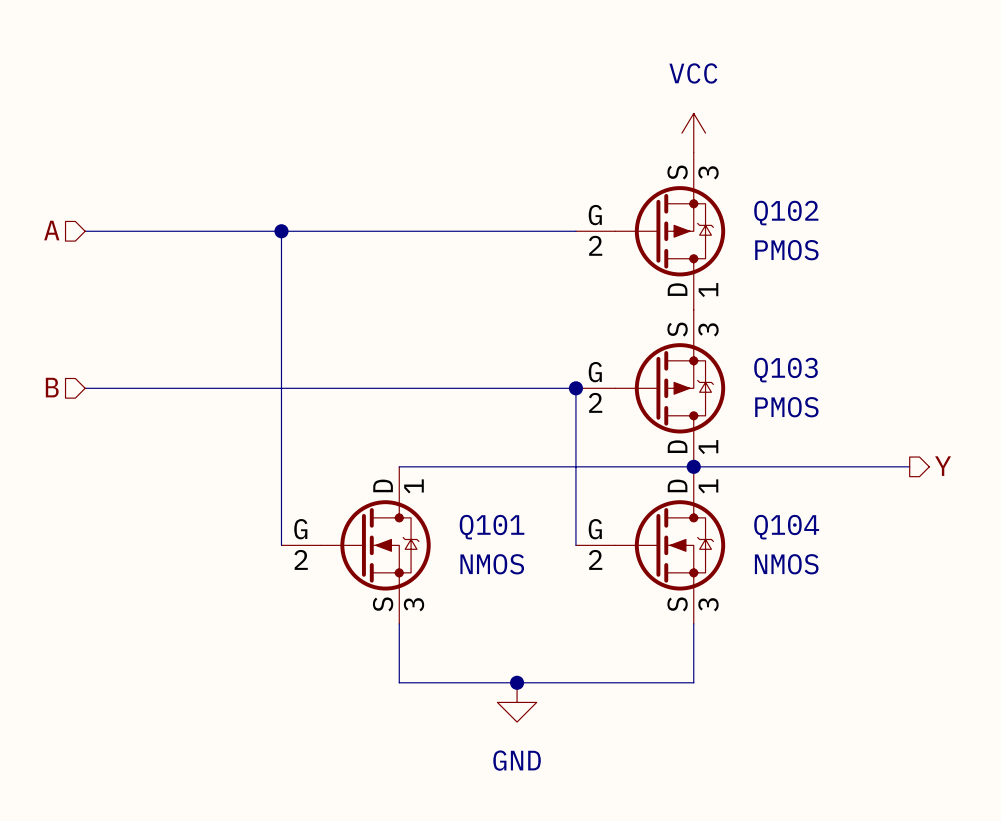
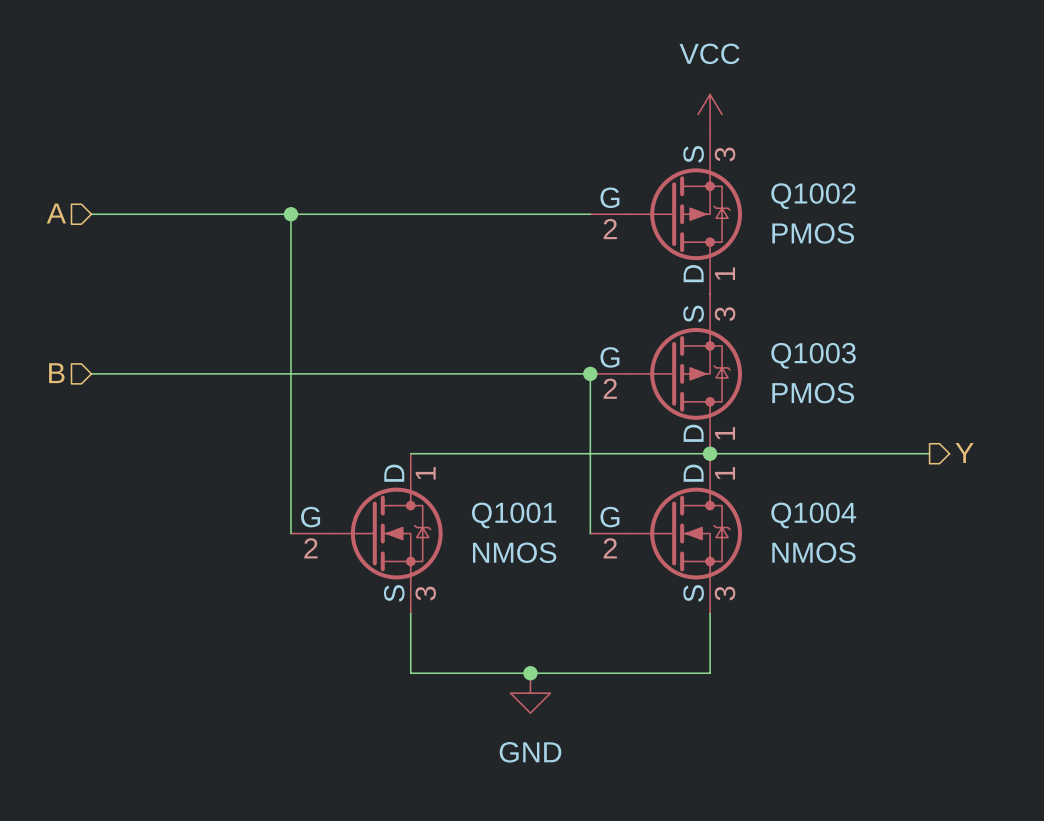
Q102 name: Q102 (786, 213) -> Q1002 (813, 196)
Q103 name: Q103 (786, 370) -> Q1003 (813, 355)
Q101 name: Q101 (492, 527) -> Q1001 (514, 515)
Q104 name: Q104 (786, 527) -> Q1004 (813, 515)

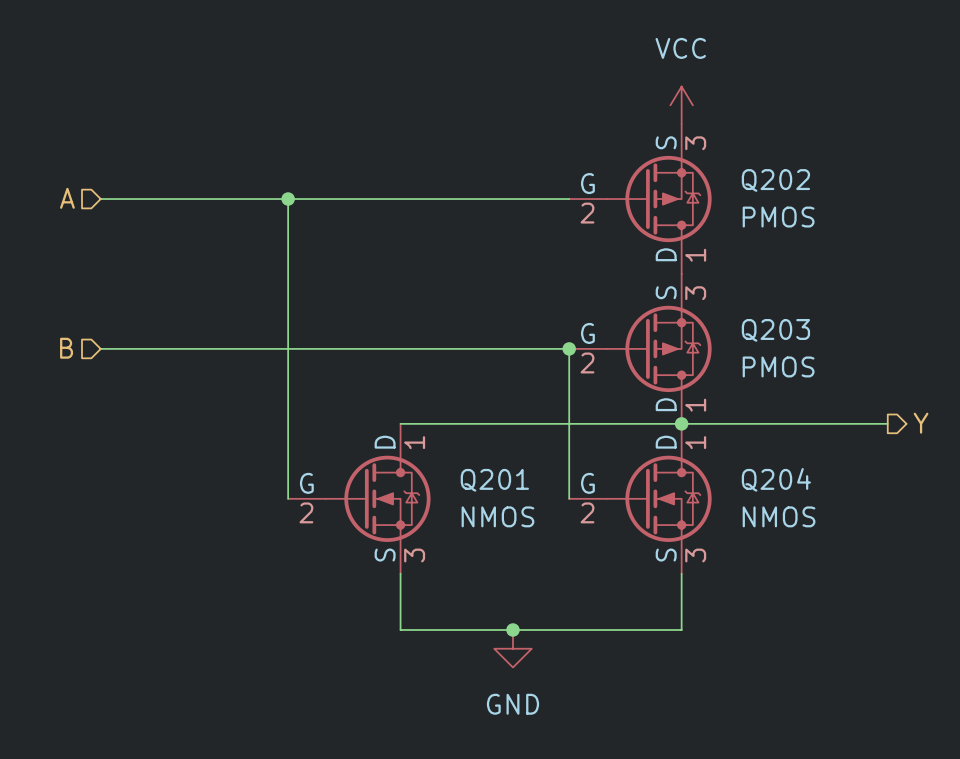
Q1002 name: Q1002 (813, 196) -> Q202 (775, 180)
Q1003 name: Q1003 (813, 355) -> Q203 (775, 330)
Q1001 name: Q1001 (514, 515) -> Q201 (494, 480)
Q1004 name: Q1004 (813, 515) -> Q204 (776, 479)

